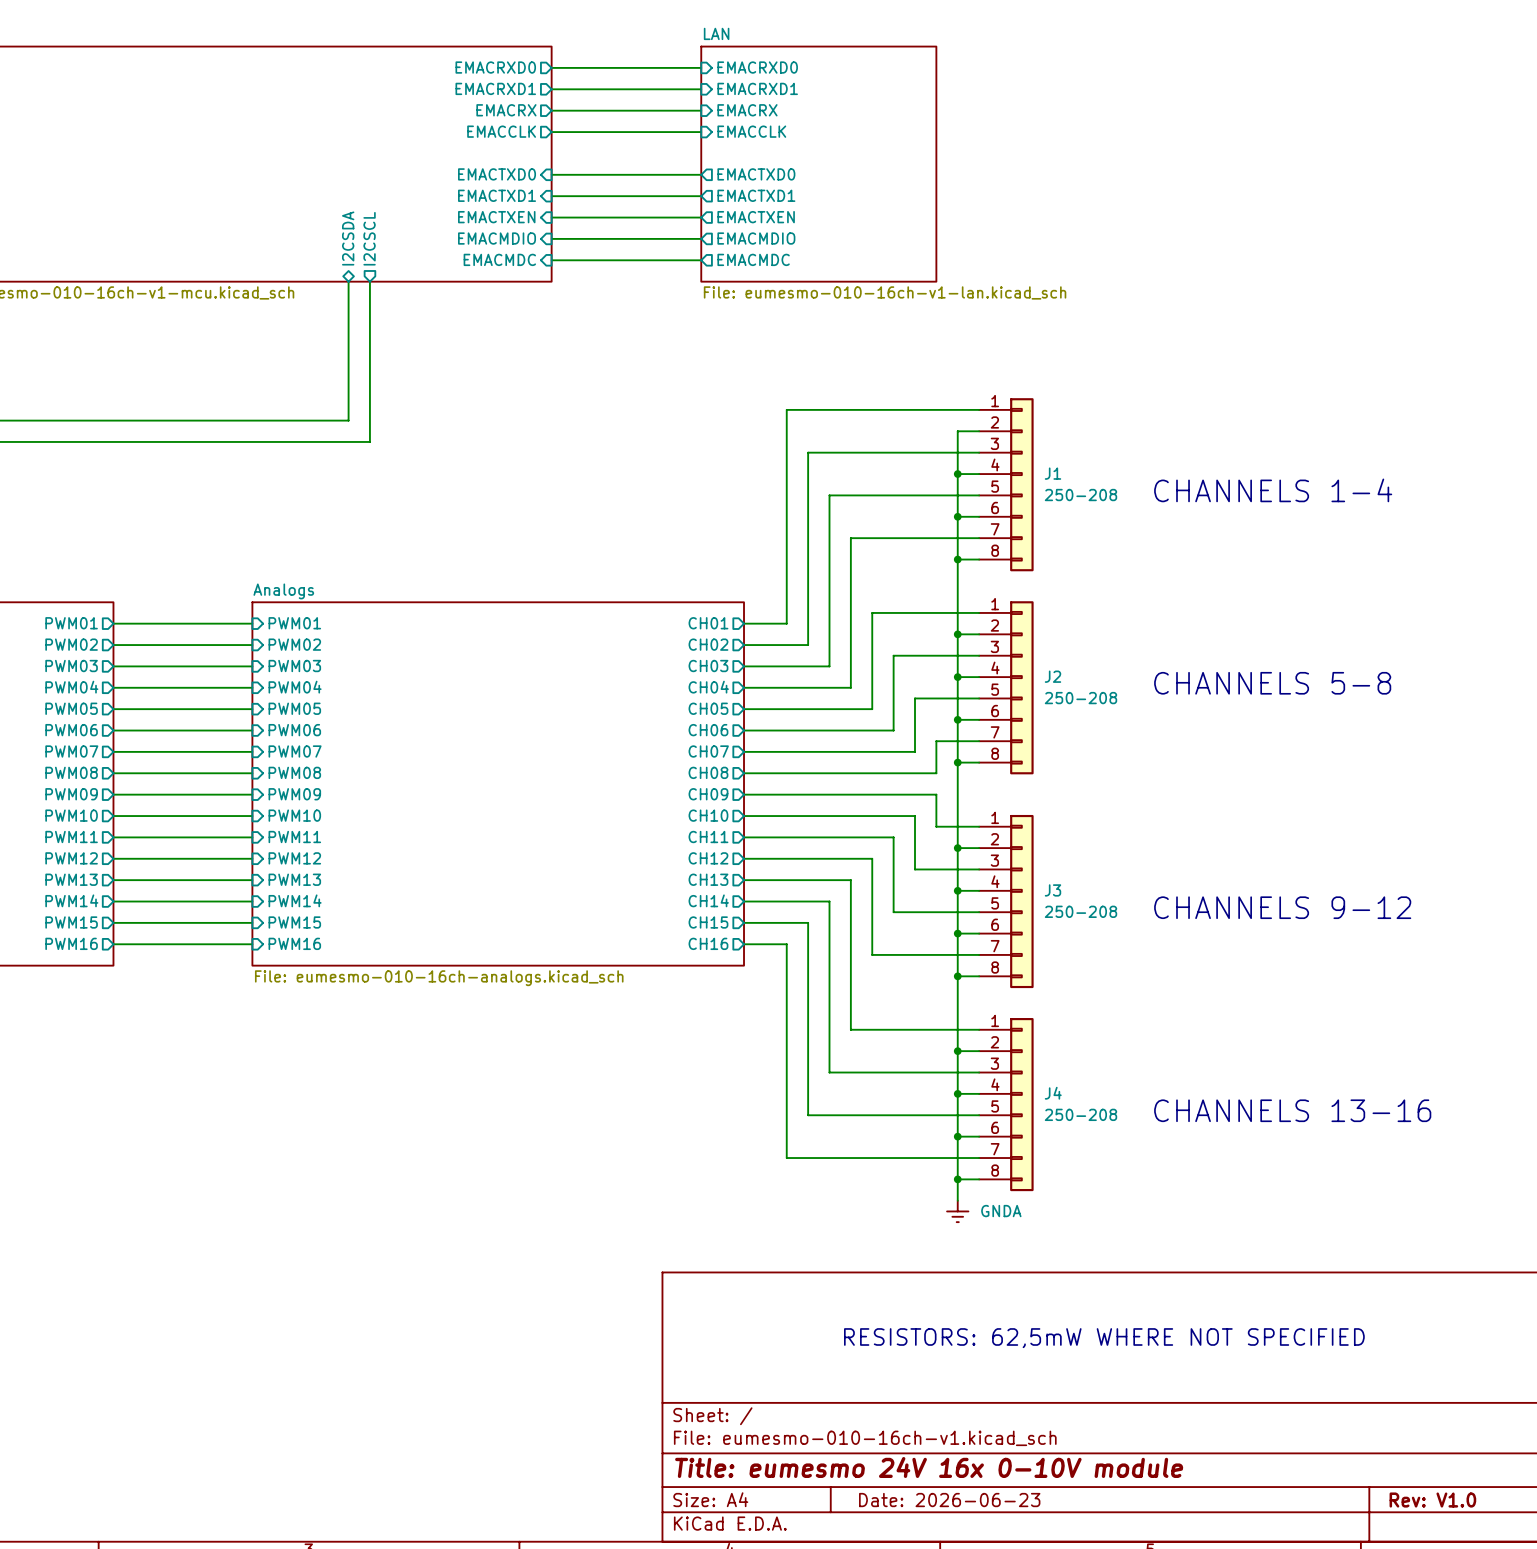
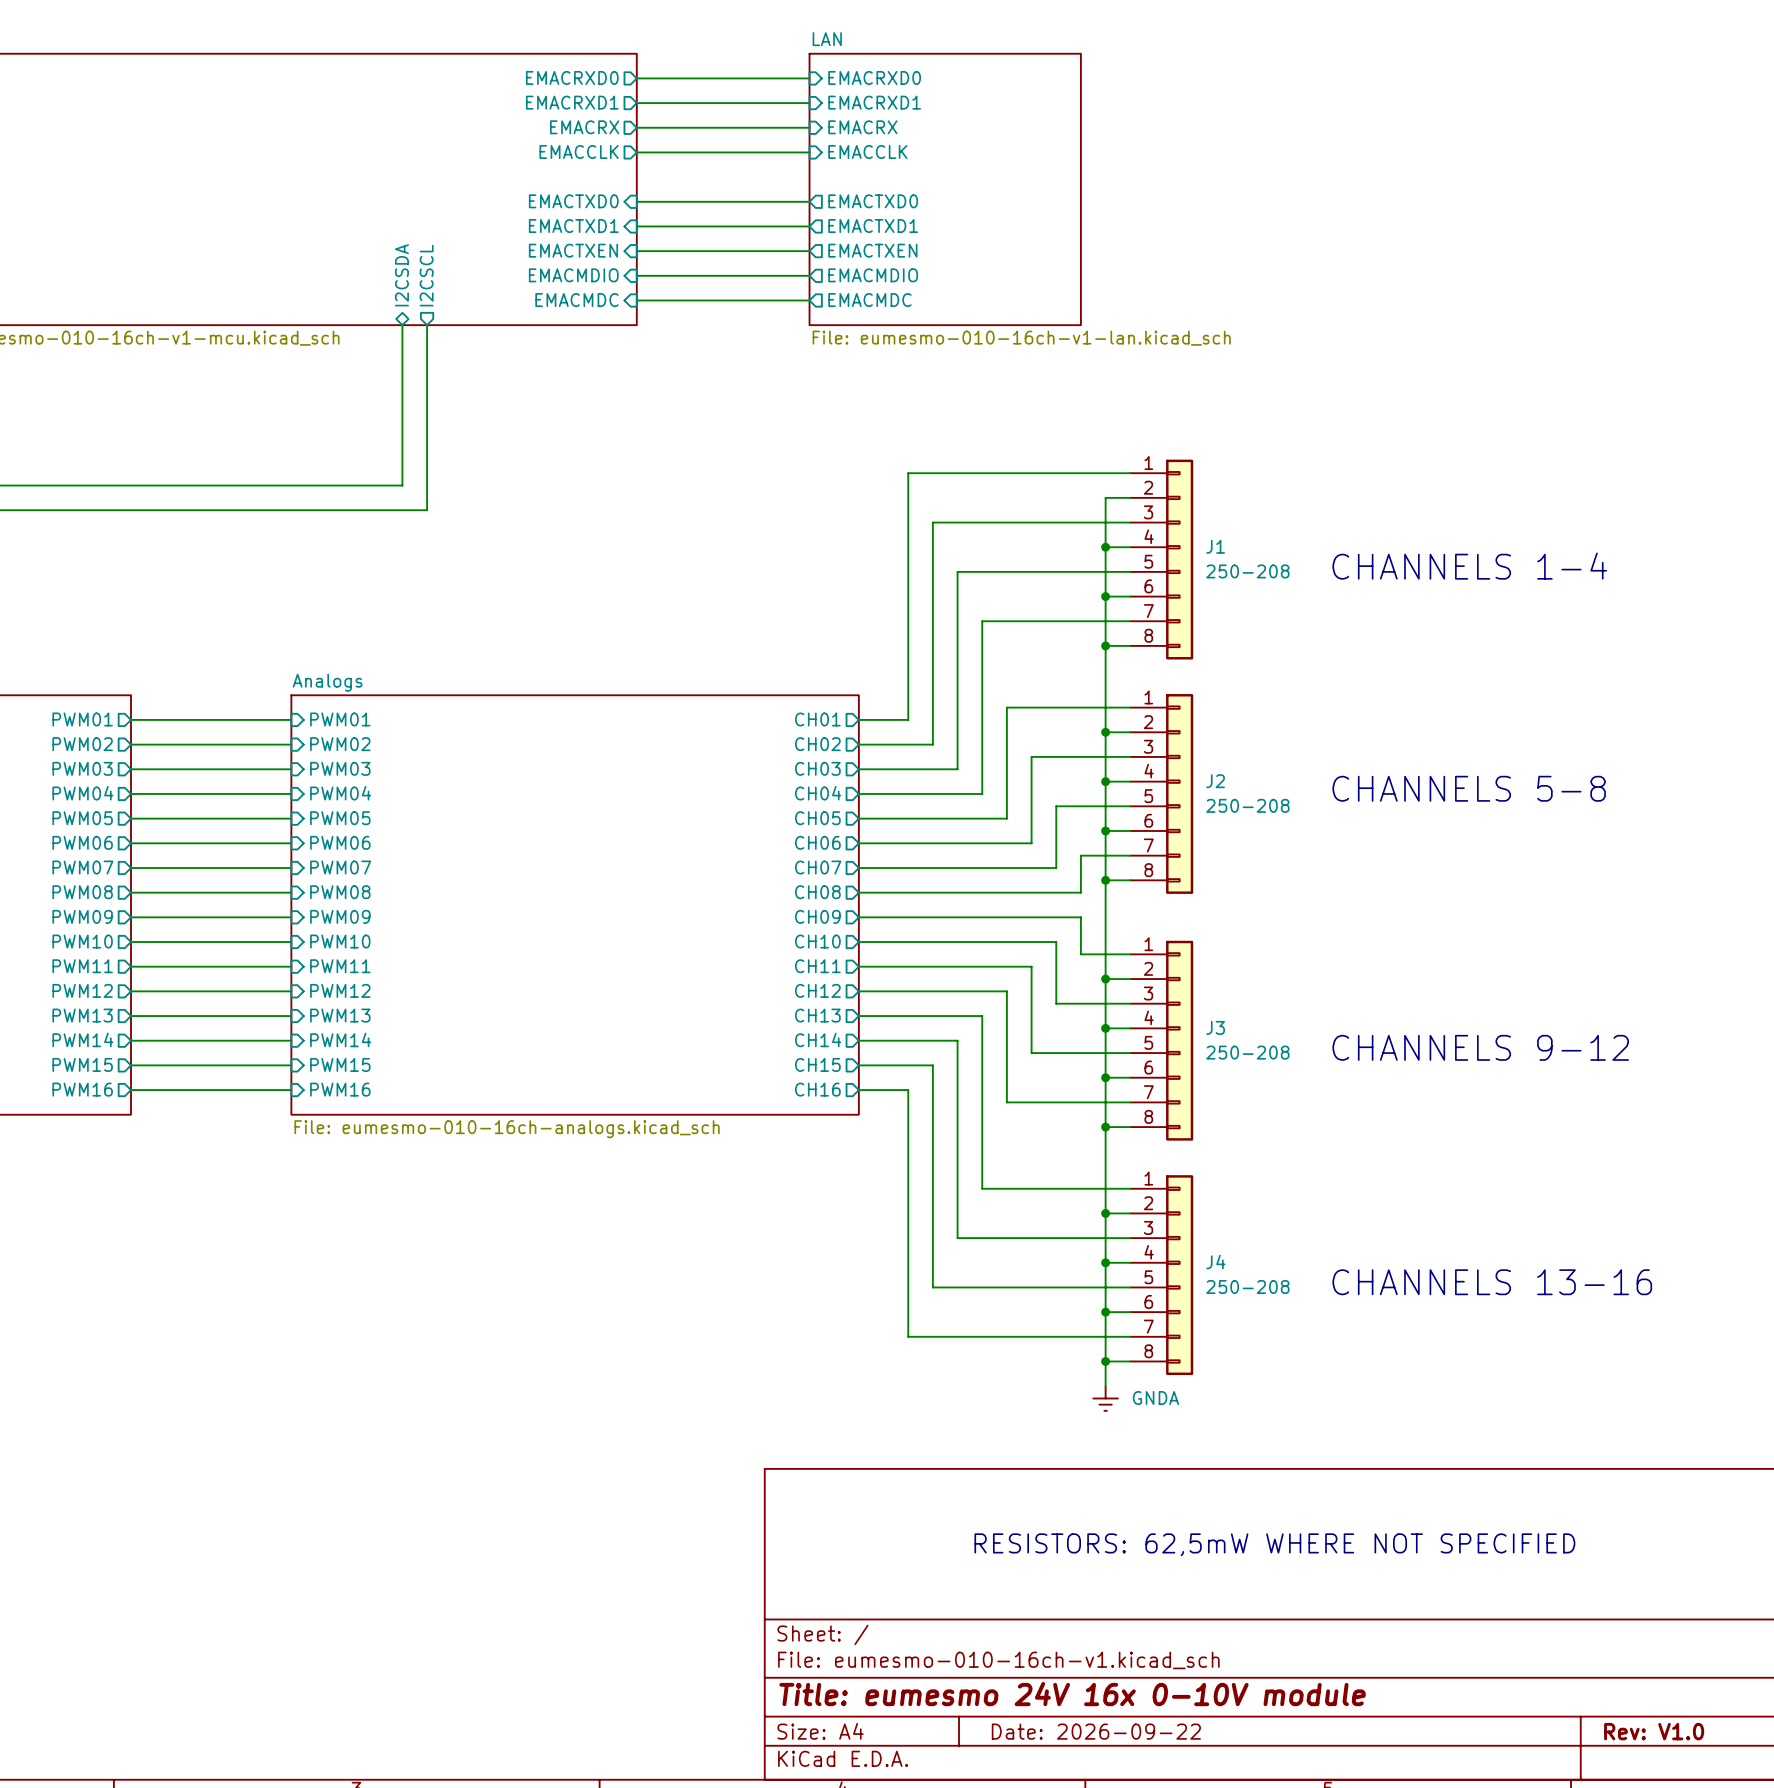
title block: Date: 2026-06-23 (949, 1500) -> Date: 2026-09-22 (1096, 1731)

